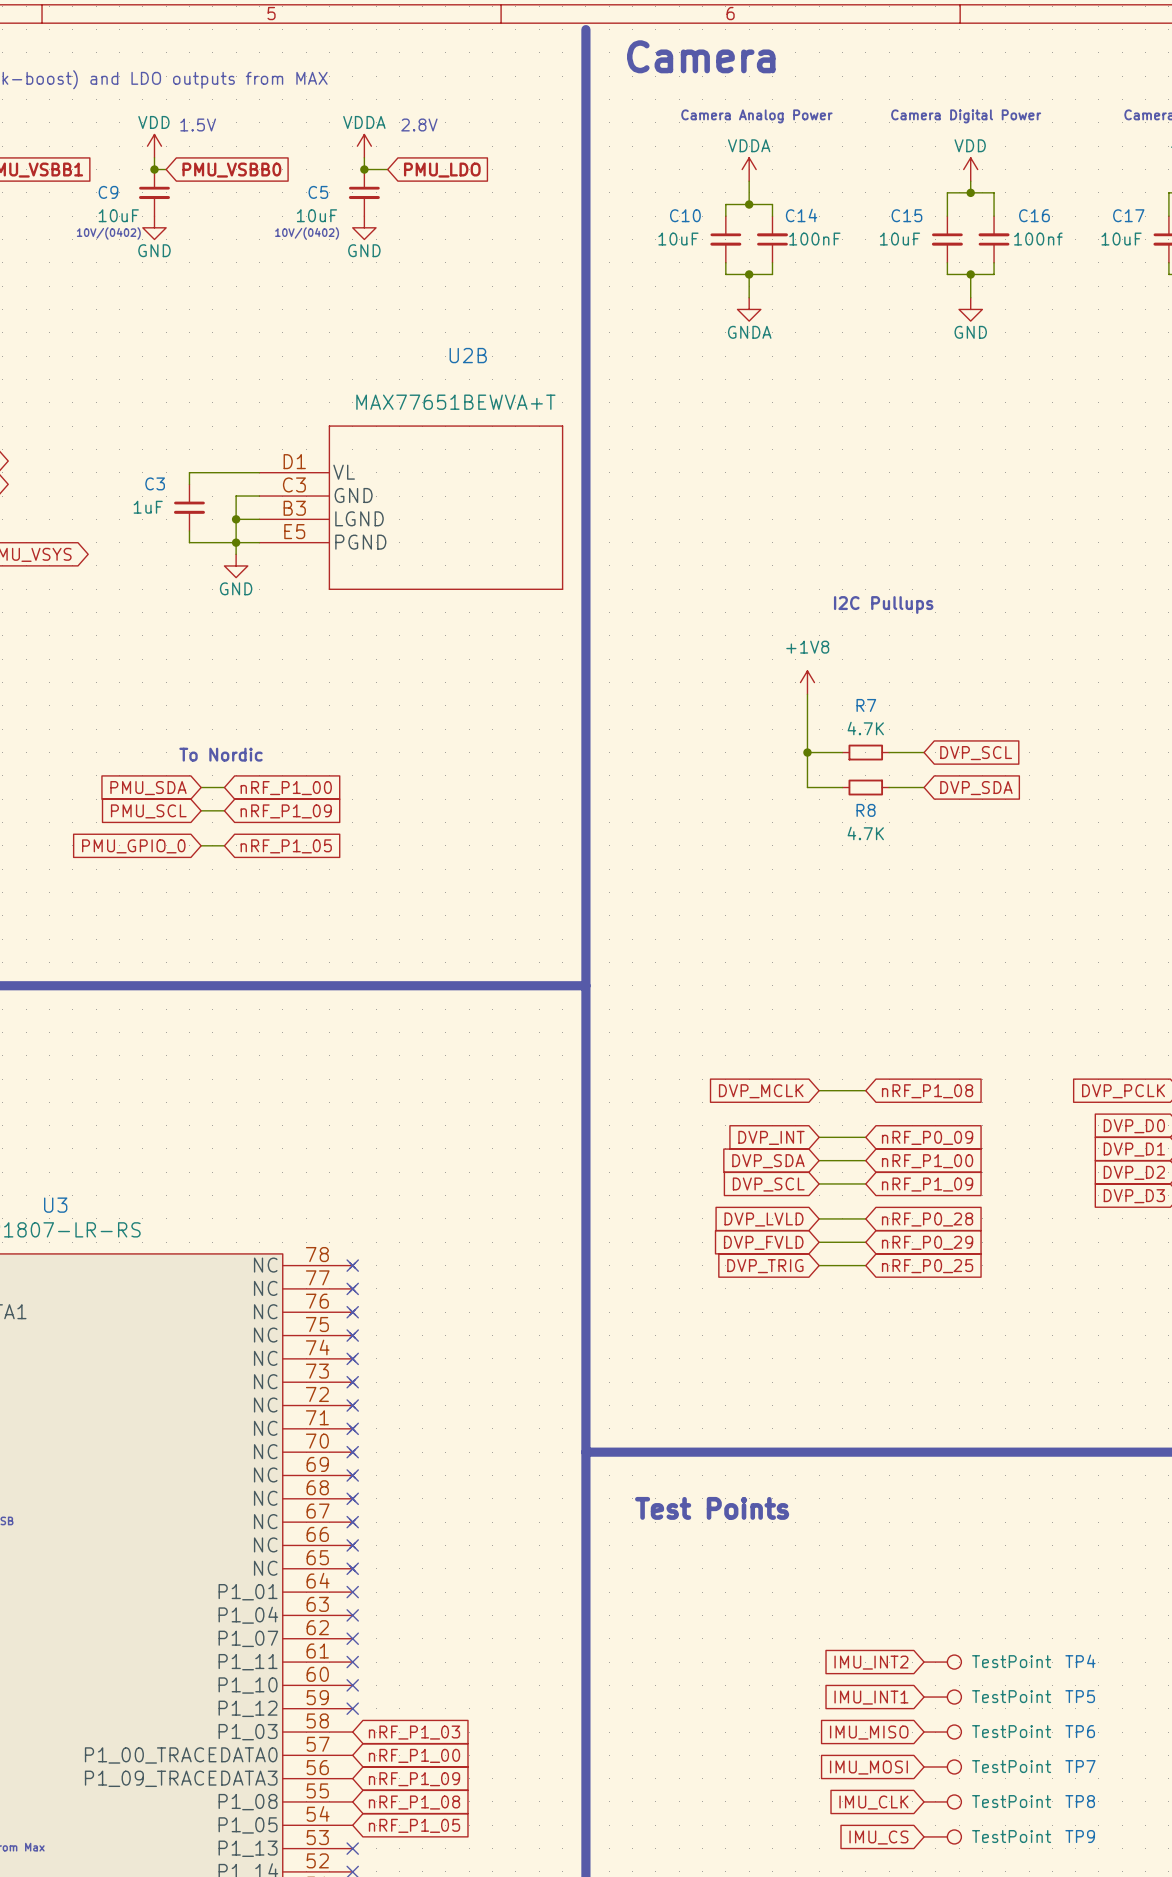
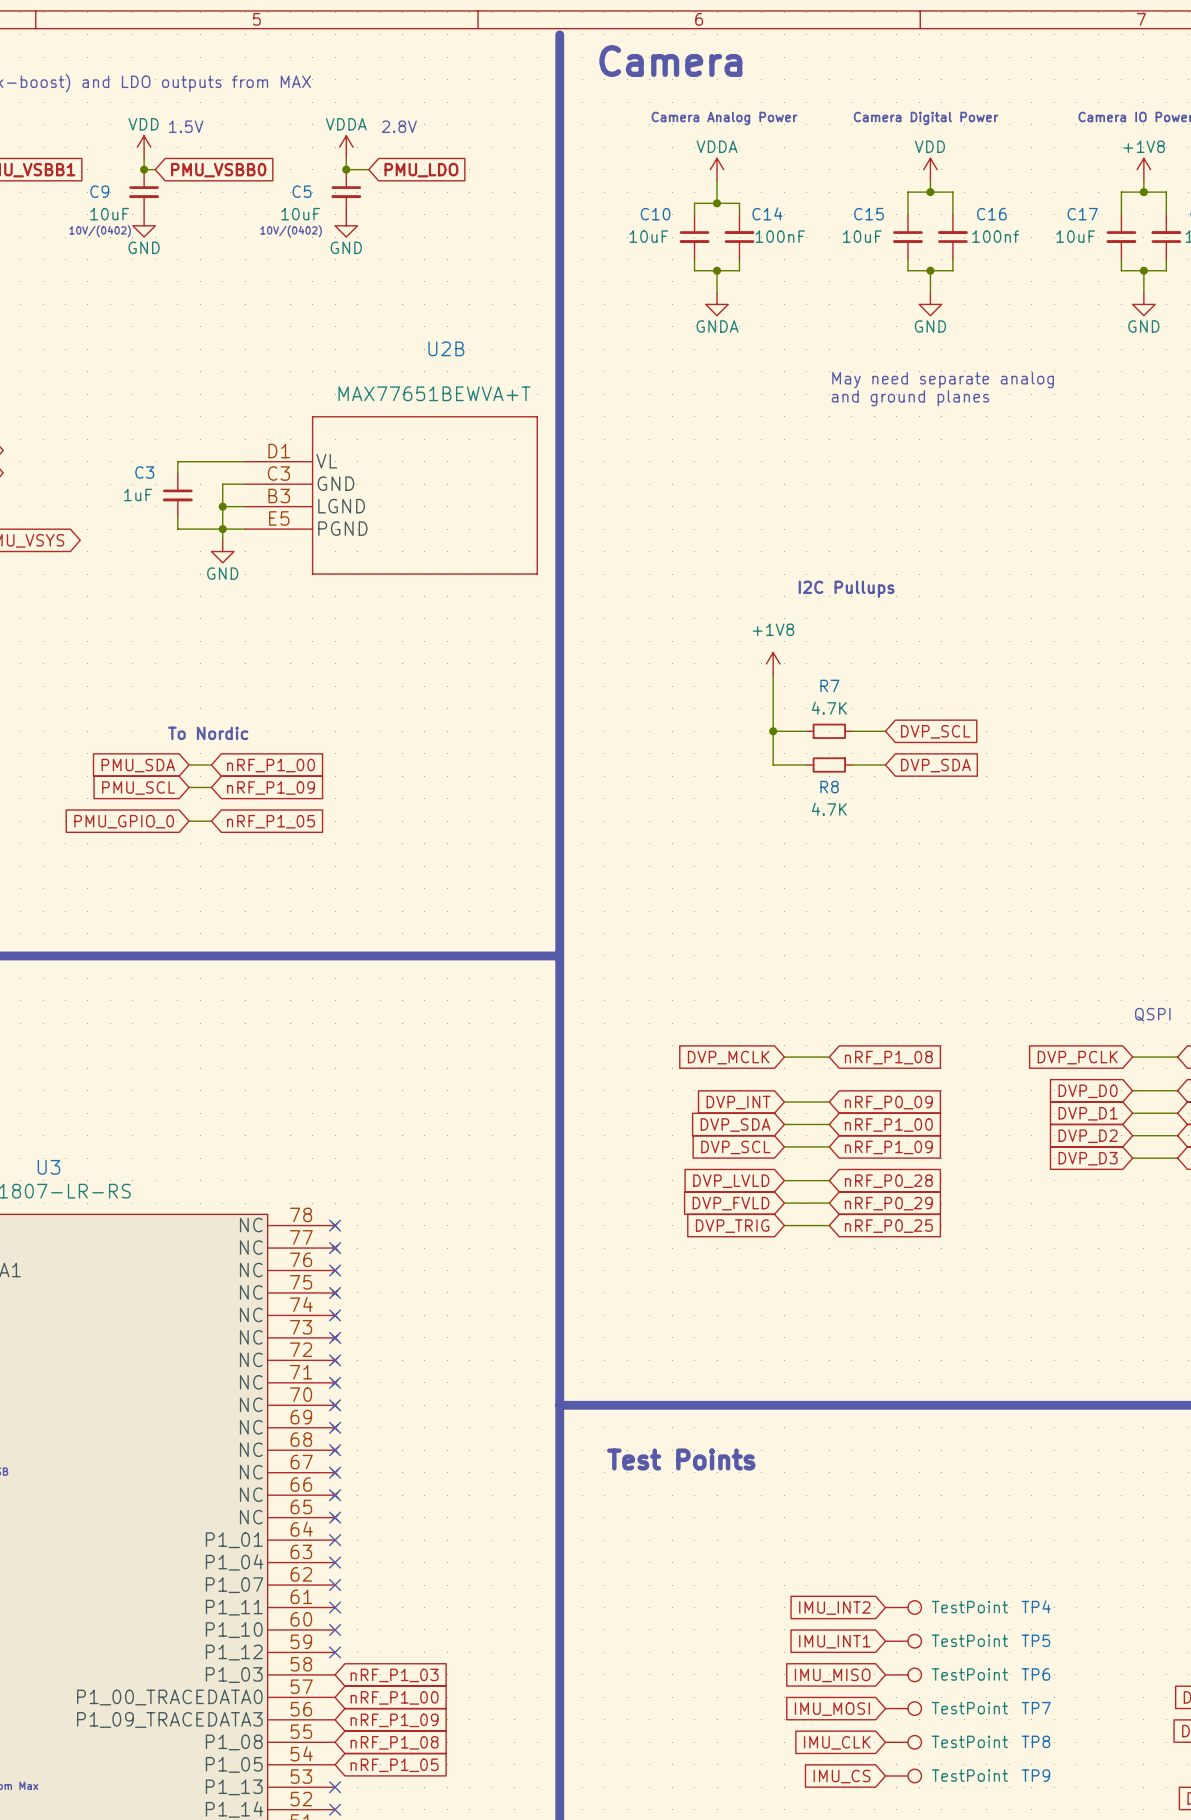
text: none -> May need separate analog (943, 380)
text: none -> and ground planes (910, 398)

